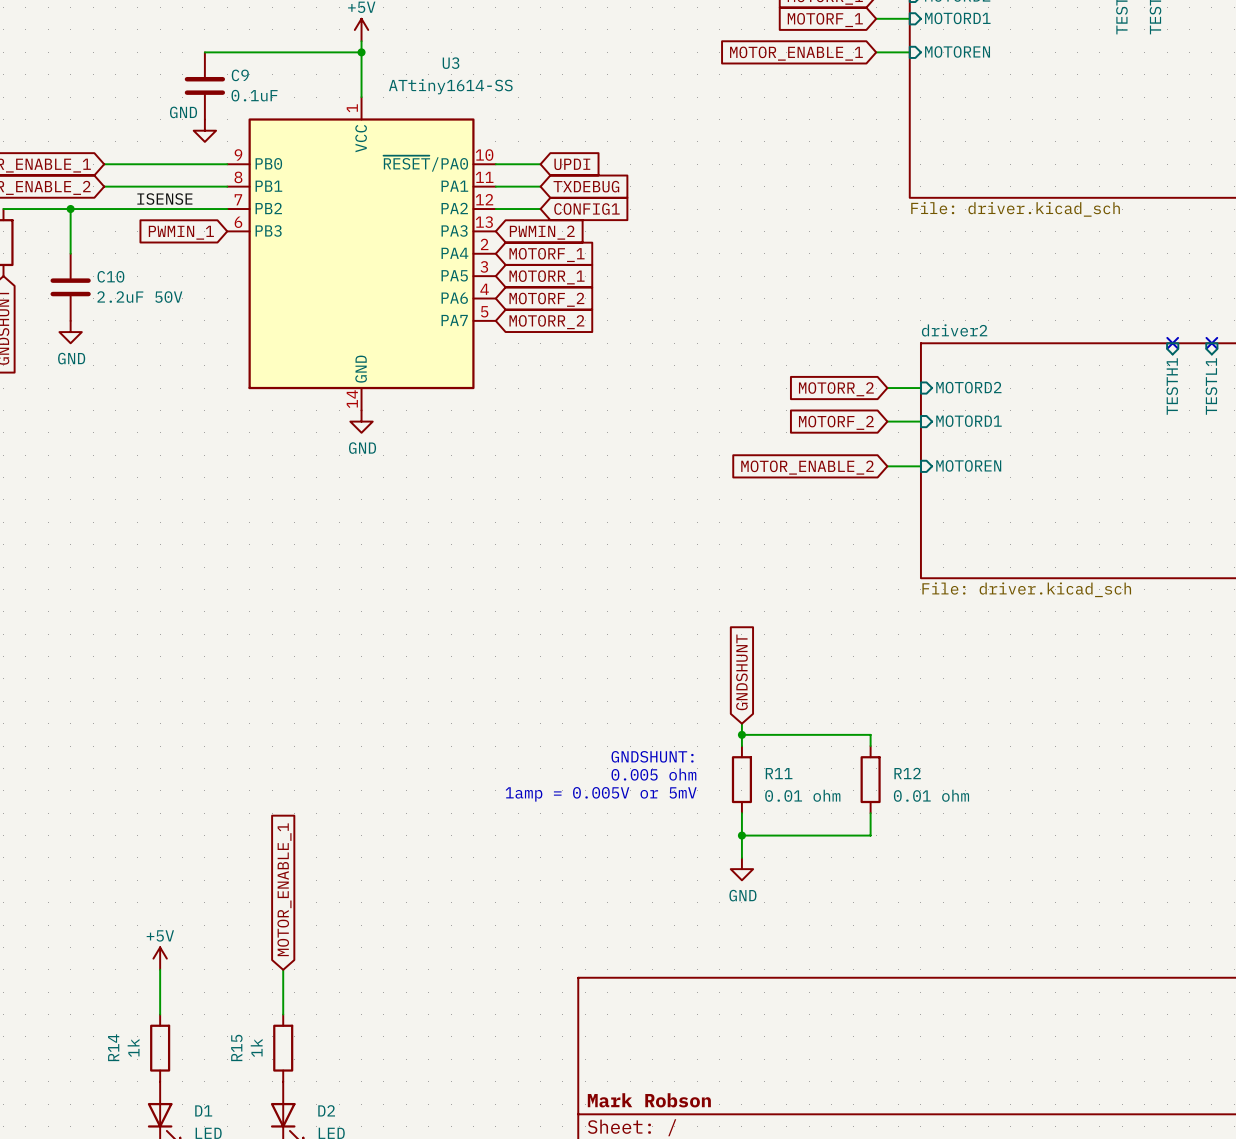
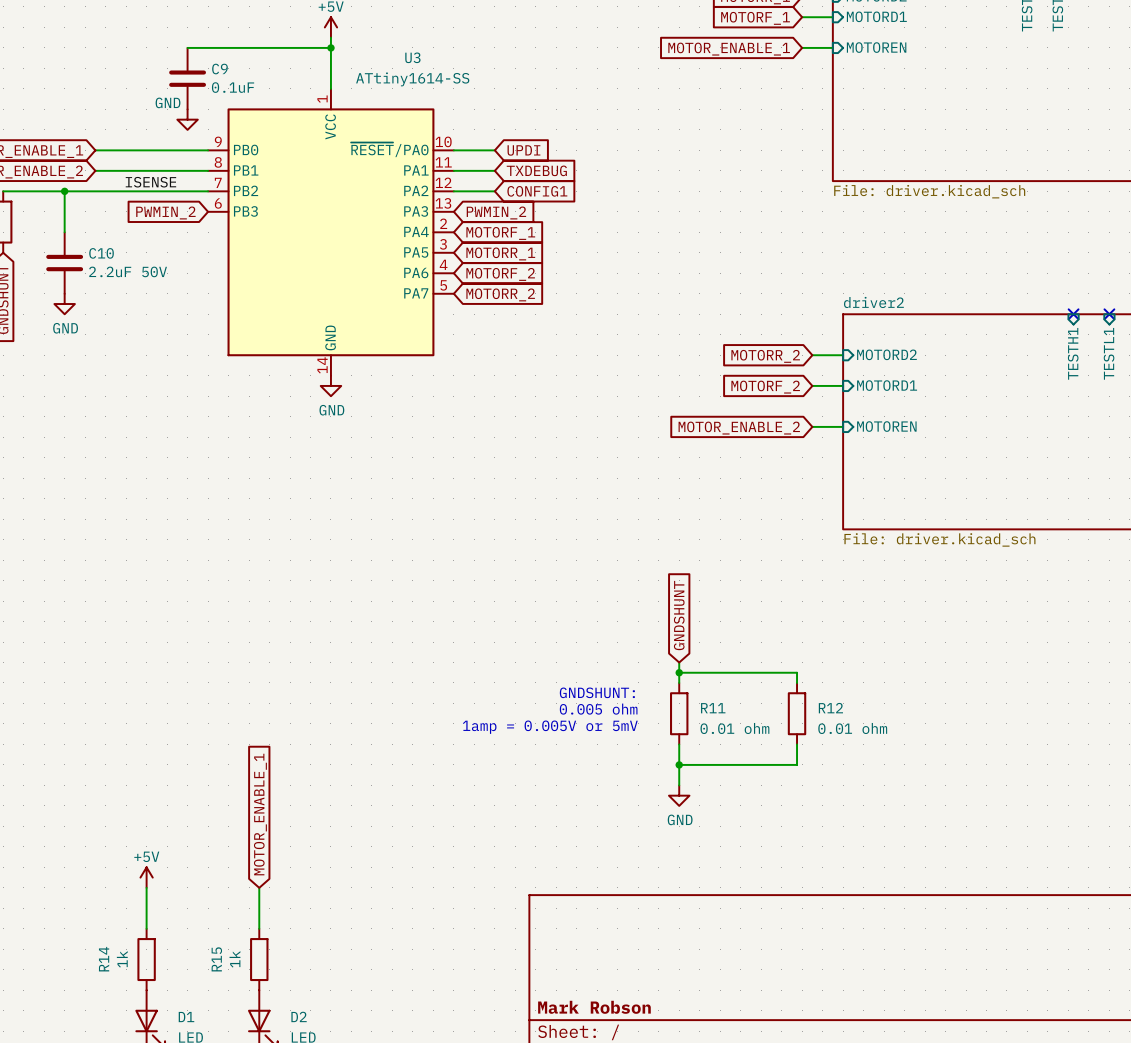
global label: PWMIN_1 (181, 232) -> PWMIN_2 (165, 212)

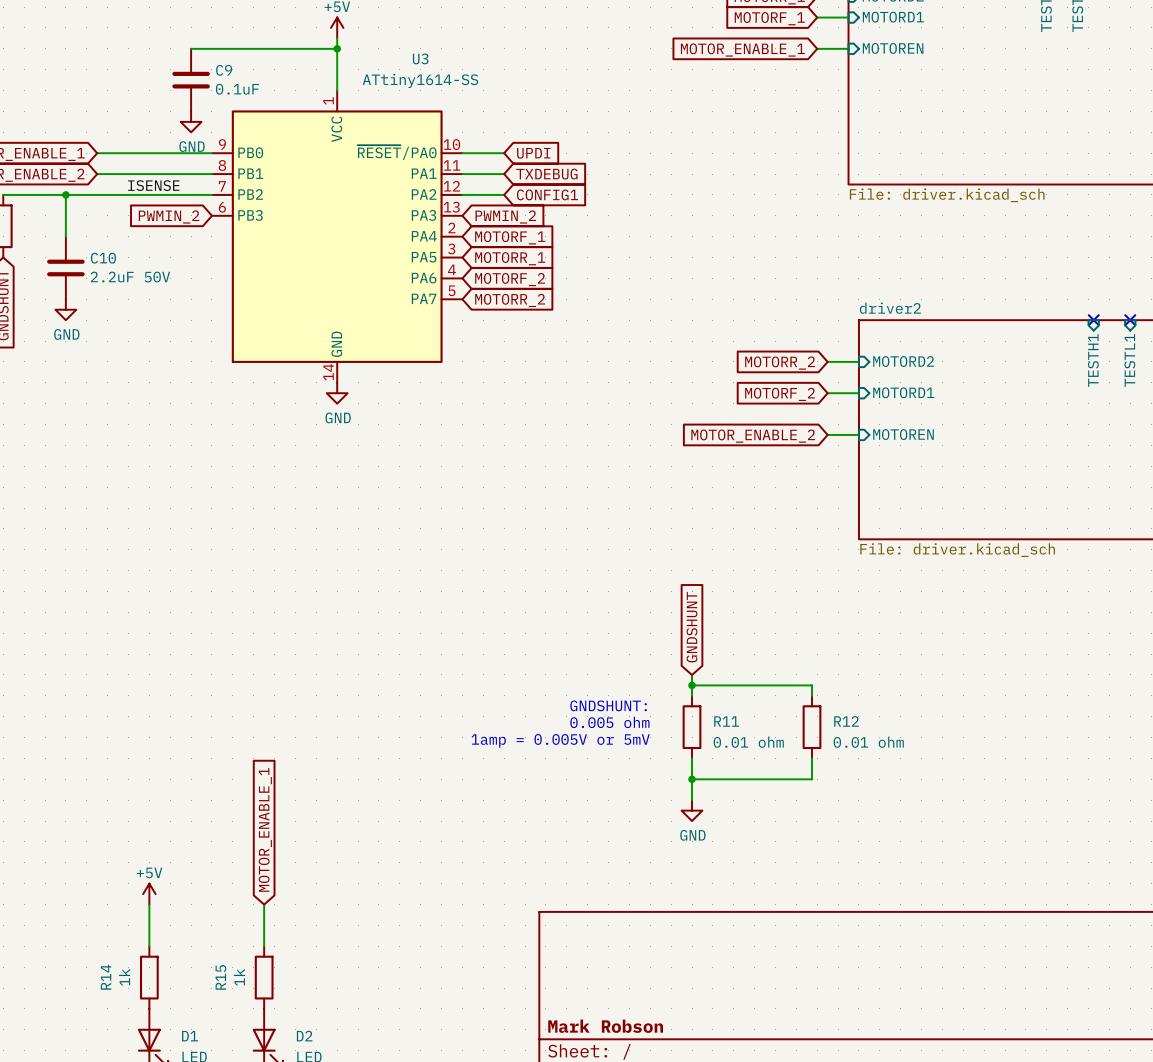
power symbol text position: GND (168, 102) -> GND (192, 146)

